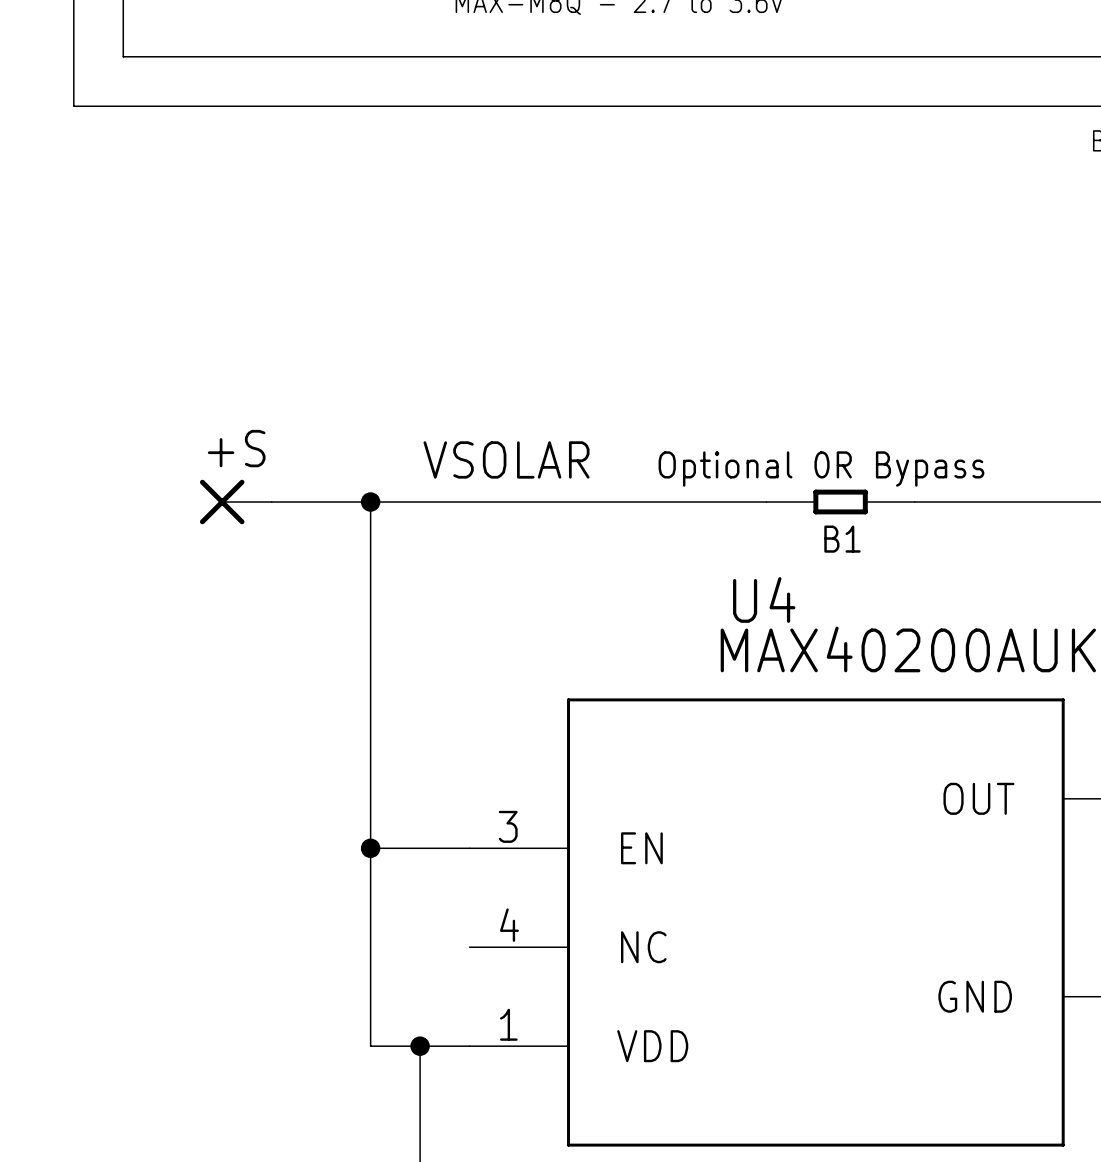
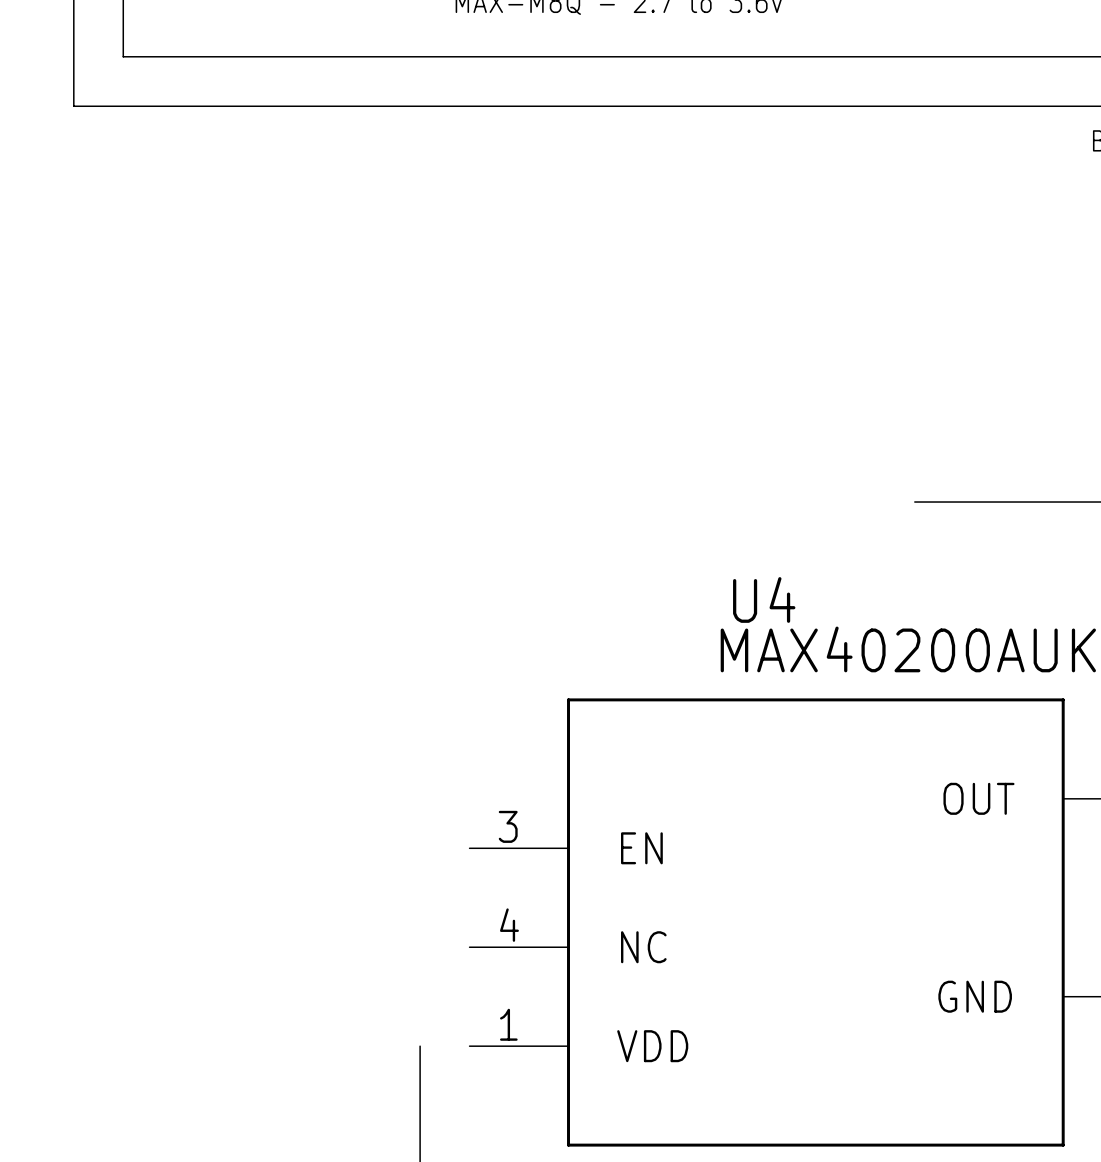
label: VSOLAR (506, 459) -> none
+S: (235, 502) -> none
wire: (271, 502) (766, 502) -> none
wire: (370, 502) (370, 1046) (469, 1046) -> none
junction: (370, 502) -> none
B1: Optional 0R Bypass (840, 502) -> none
wire: (370, 848) (469, 848) -> none
junction: (370, 848) -> none
junction: (420, 1046) -> none

